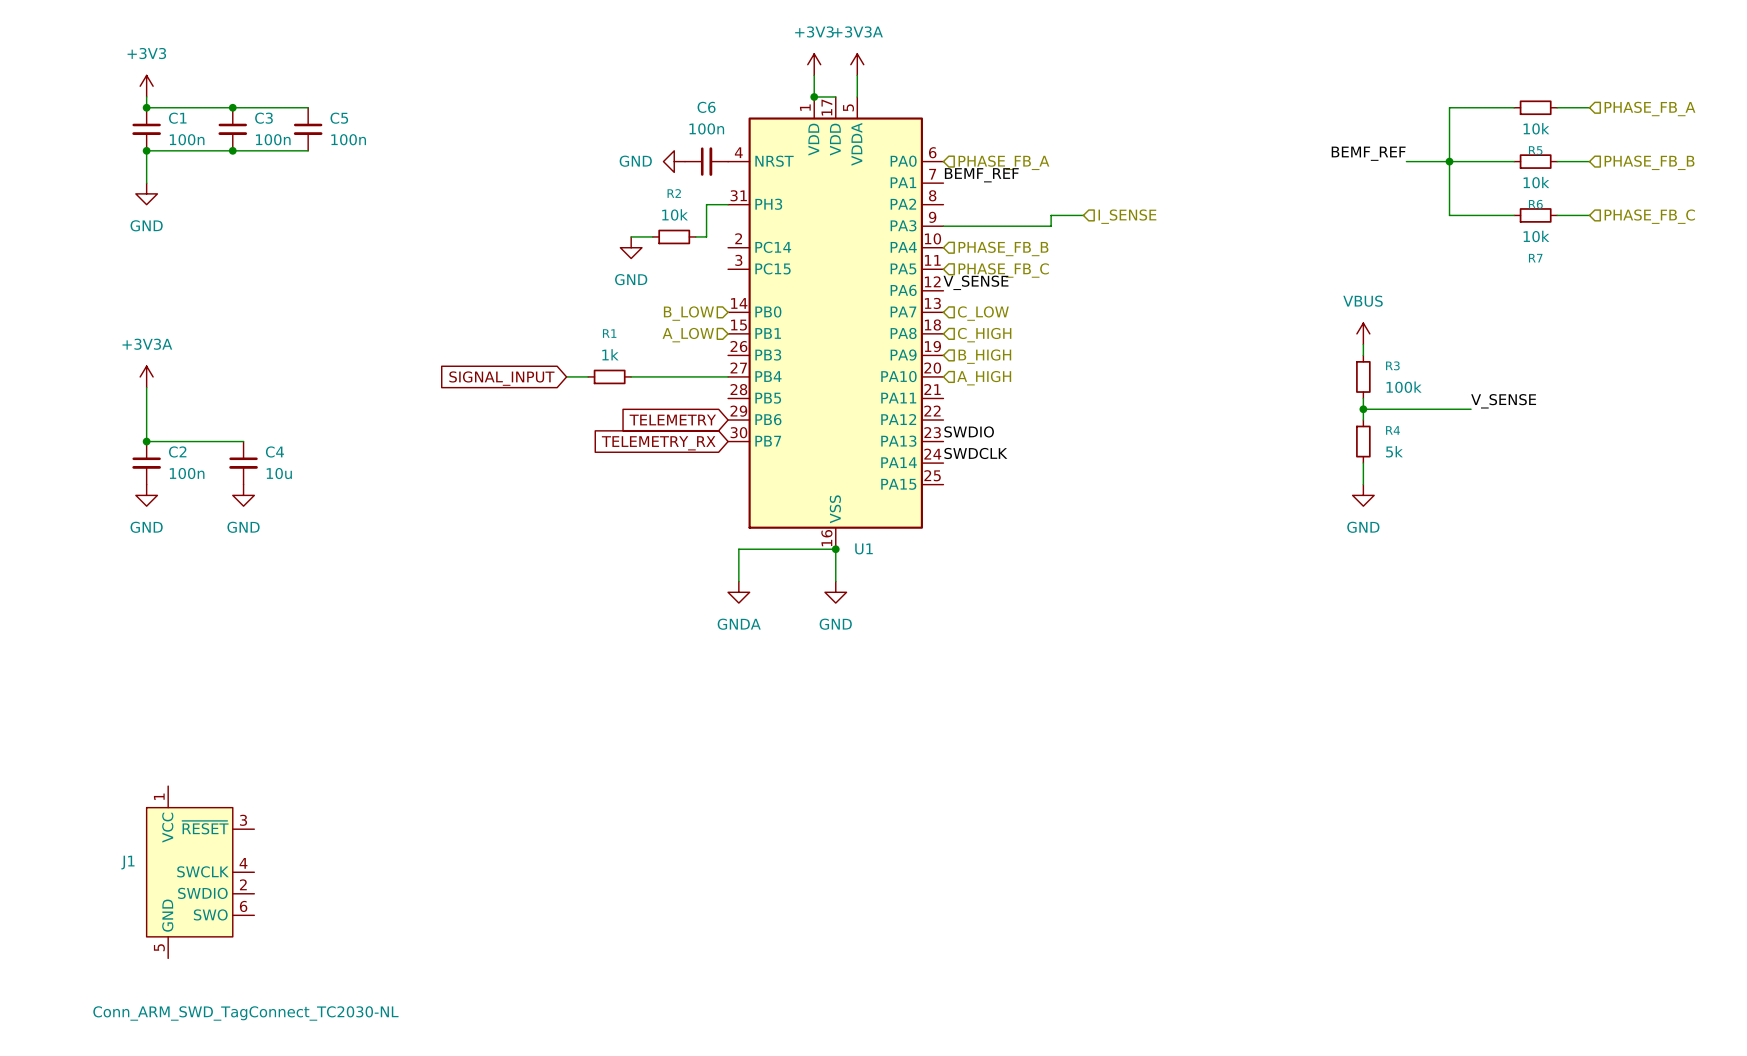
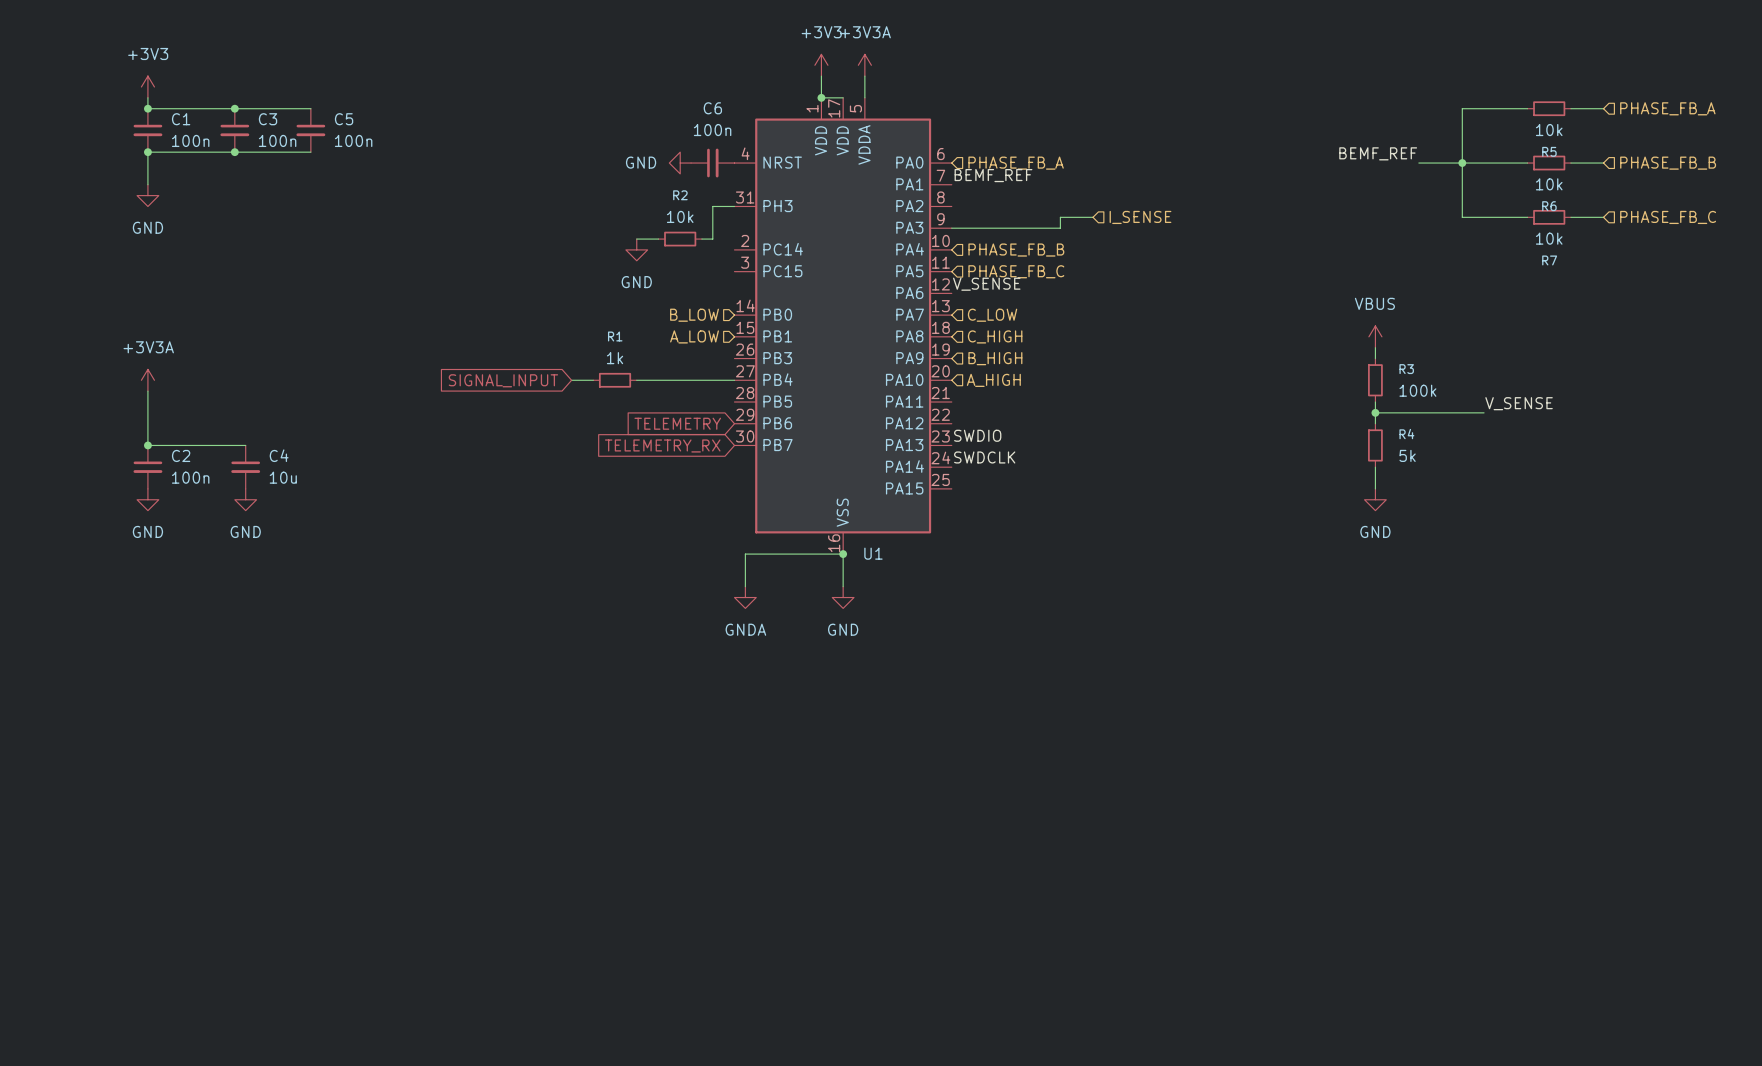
J1: Conn_ARM_SWD_TagConnect_TC2030-NL (200, 872) -> none

